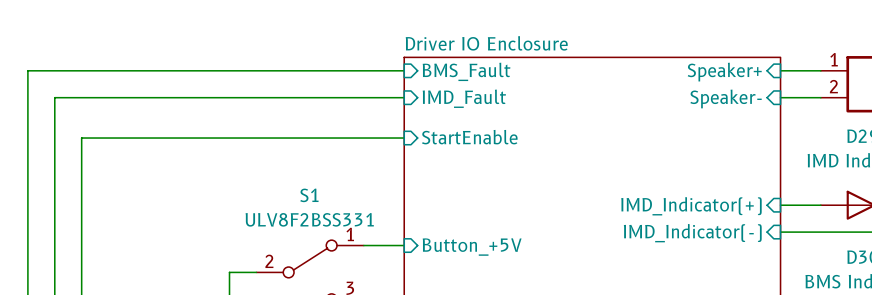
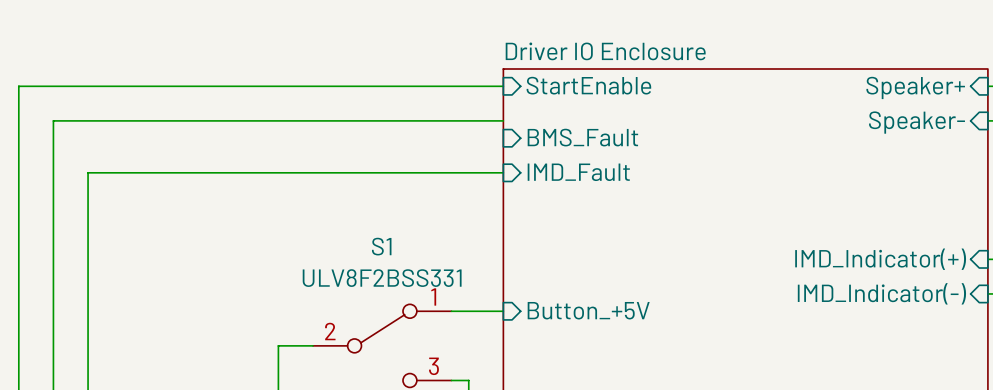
sheet pin: BMS_Fault (466, 71) -> StartEnable (588, 85)
sheet pin: IMD_Fault (464, 98) -> BMS_Fault (582, 137)
sheet pin: StartEnable (469, 137) -> IMD_Fault (578, 172)

